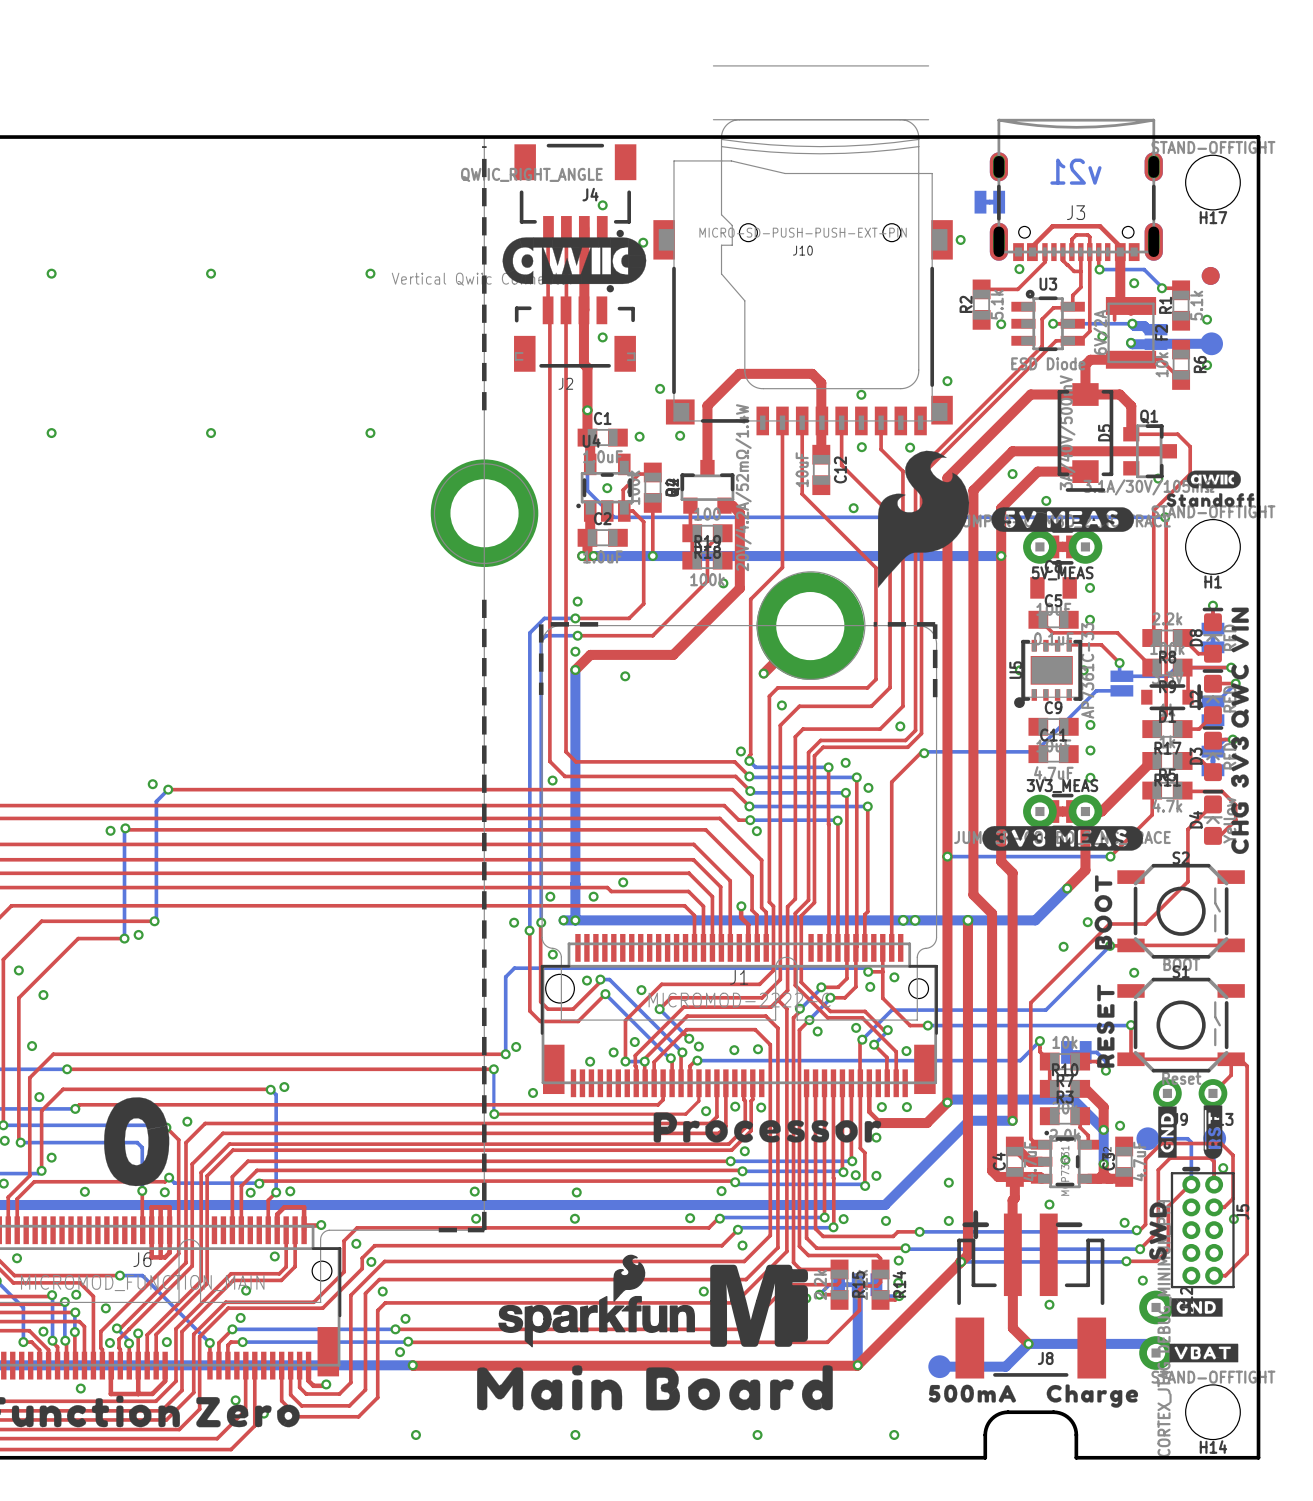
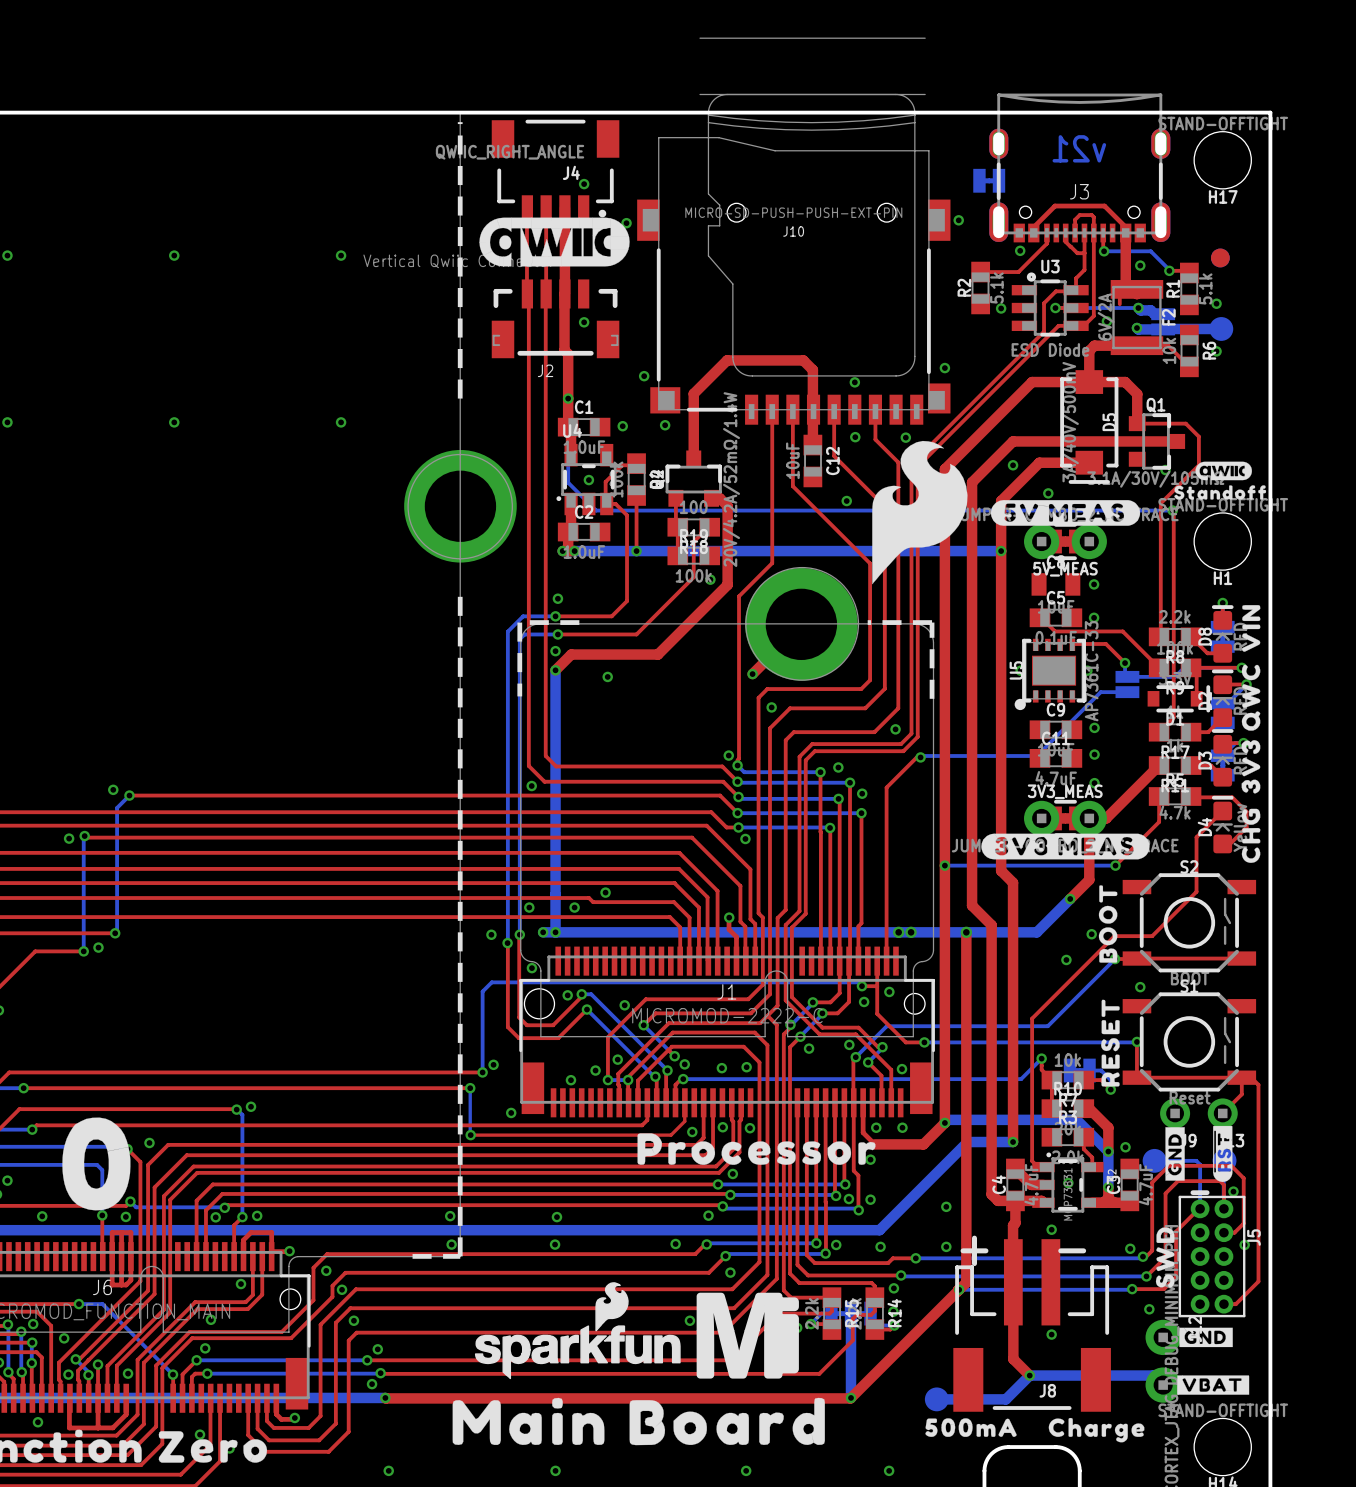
J2 footprint: [514, 285, 636, 372] -> [491, 279, 620, 359]

